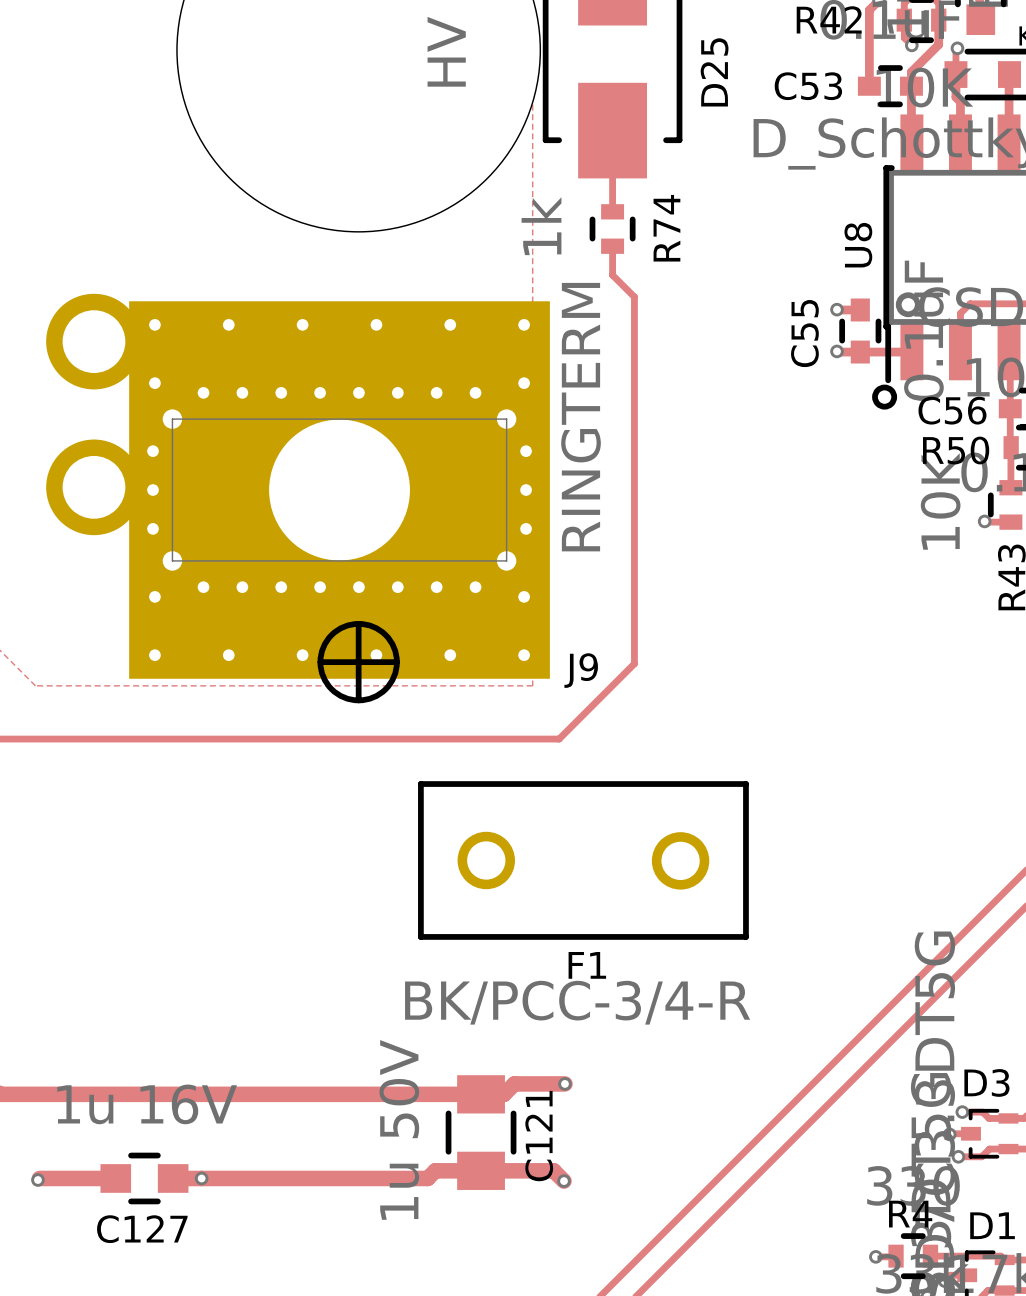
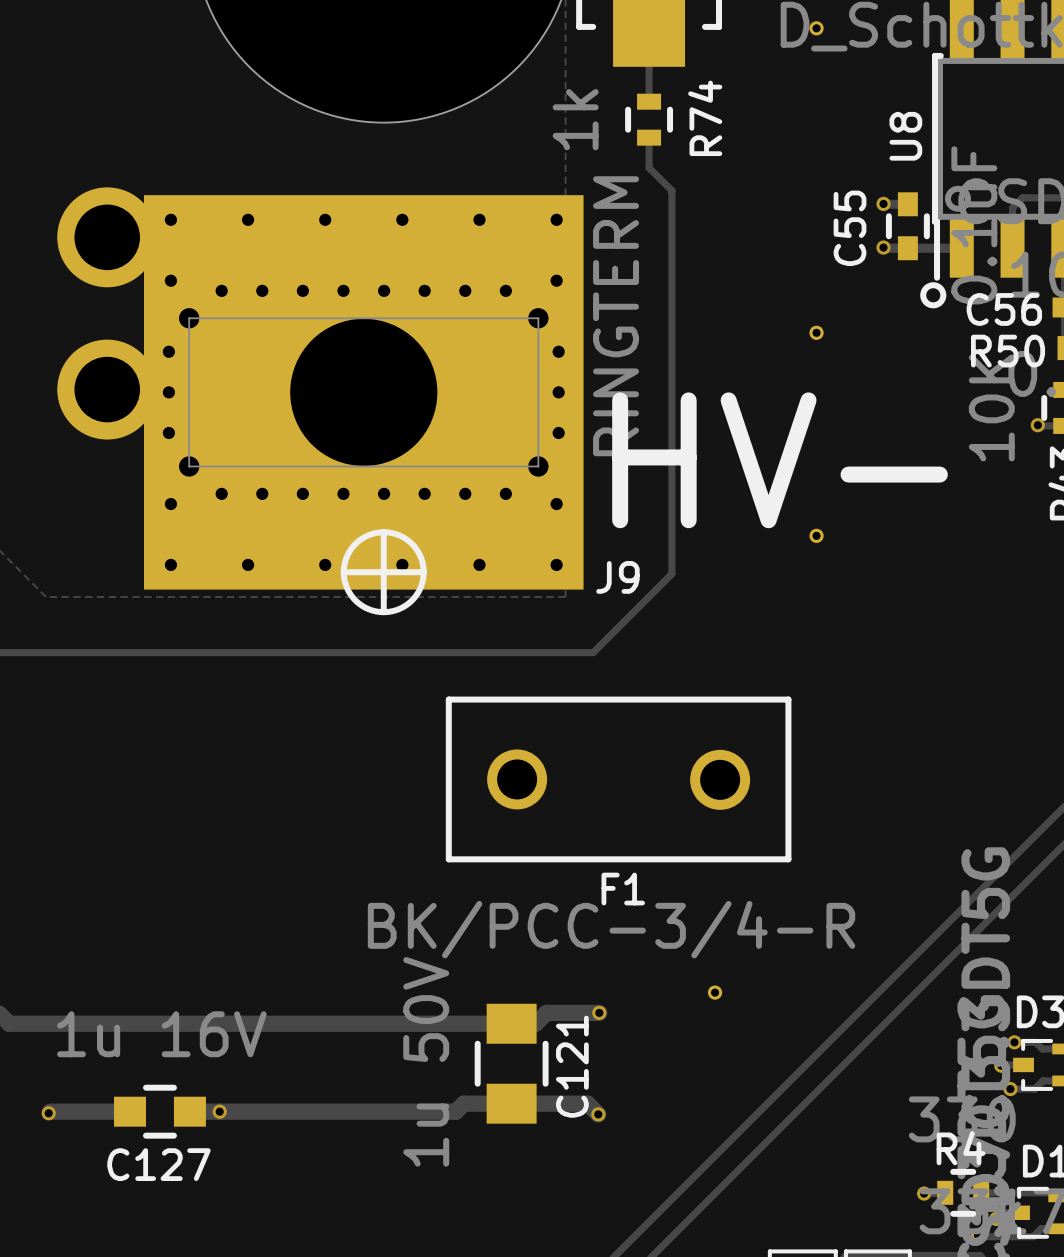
part: none -> (816, 28)
part: none -> (816, 332)
text: none -> HV- (780, 460)
part: none -> (816, 535)
part: none -> (715, 992)

